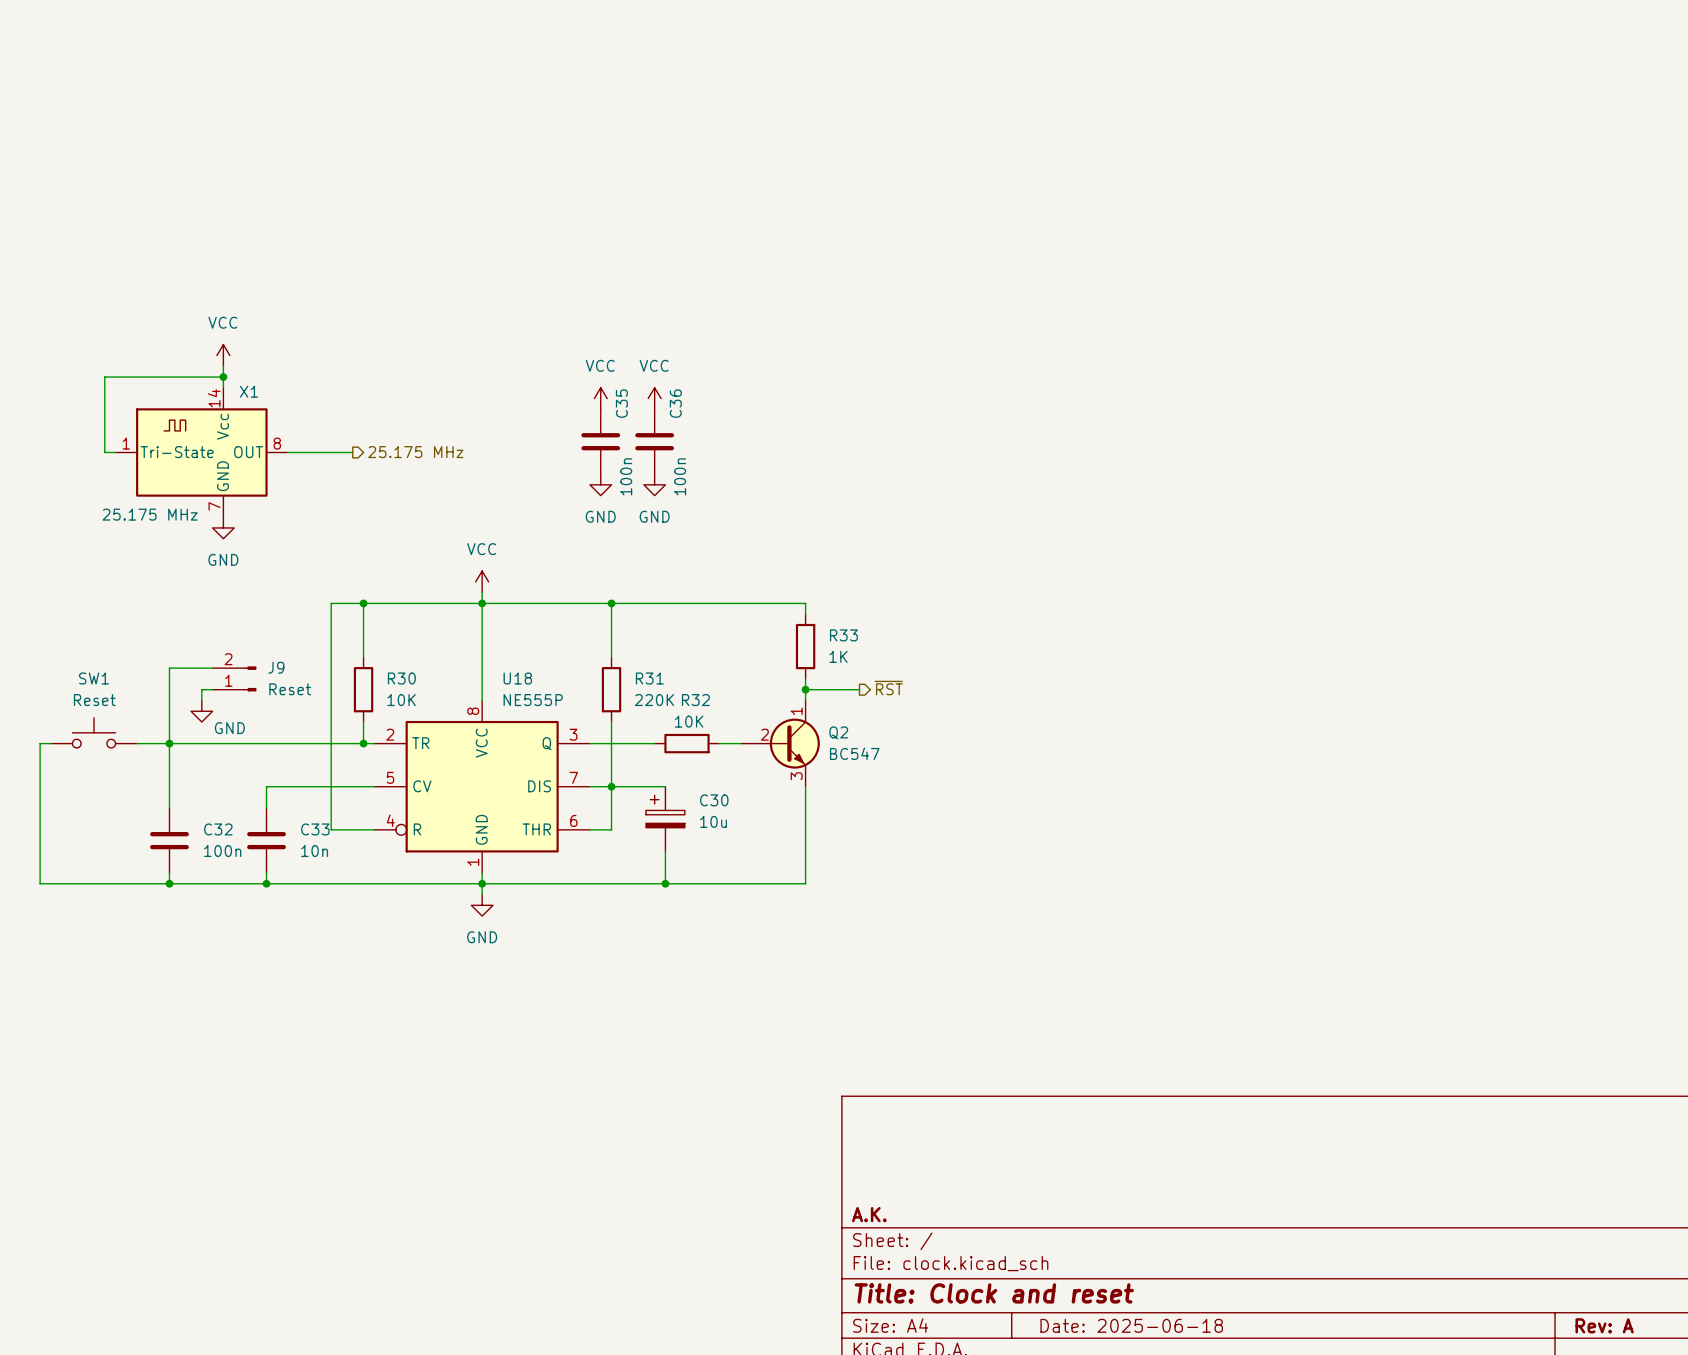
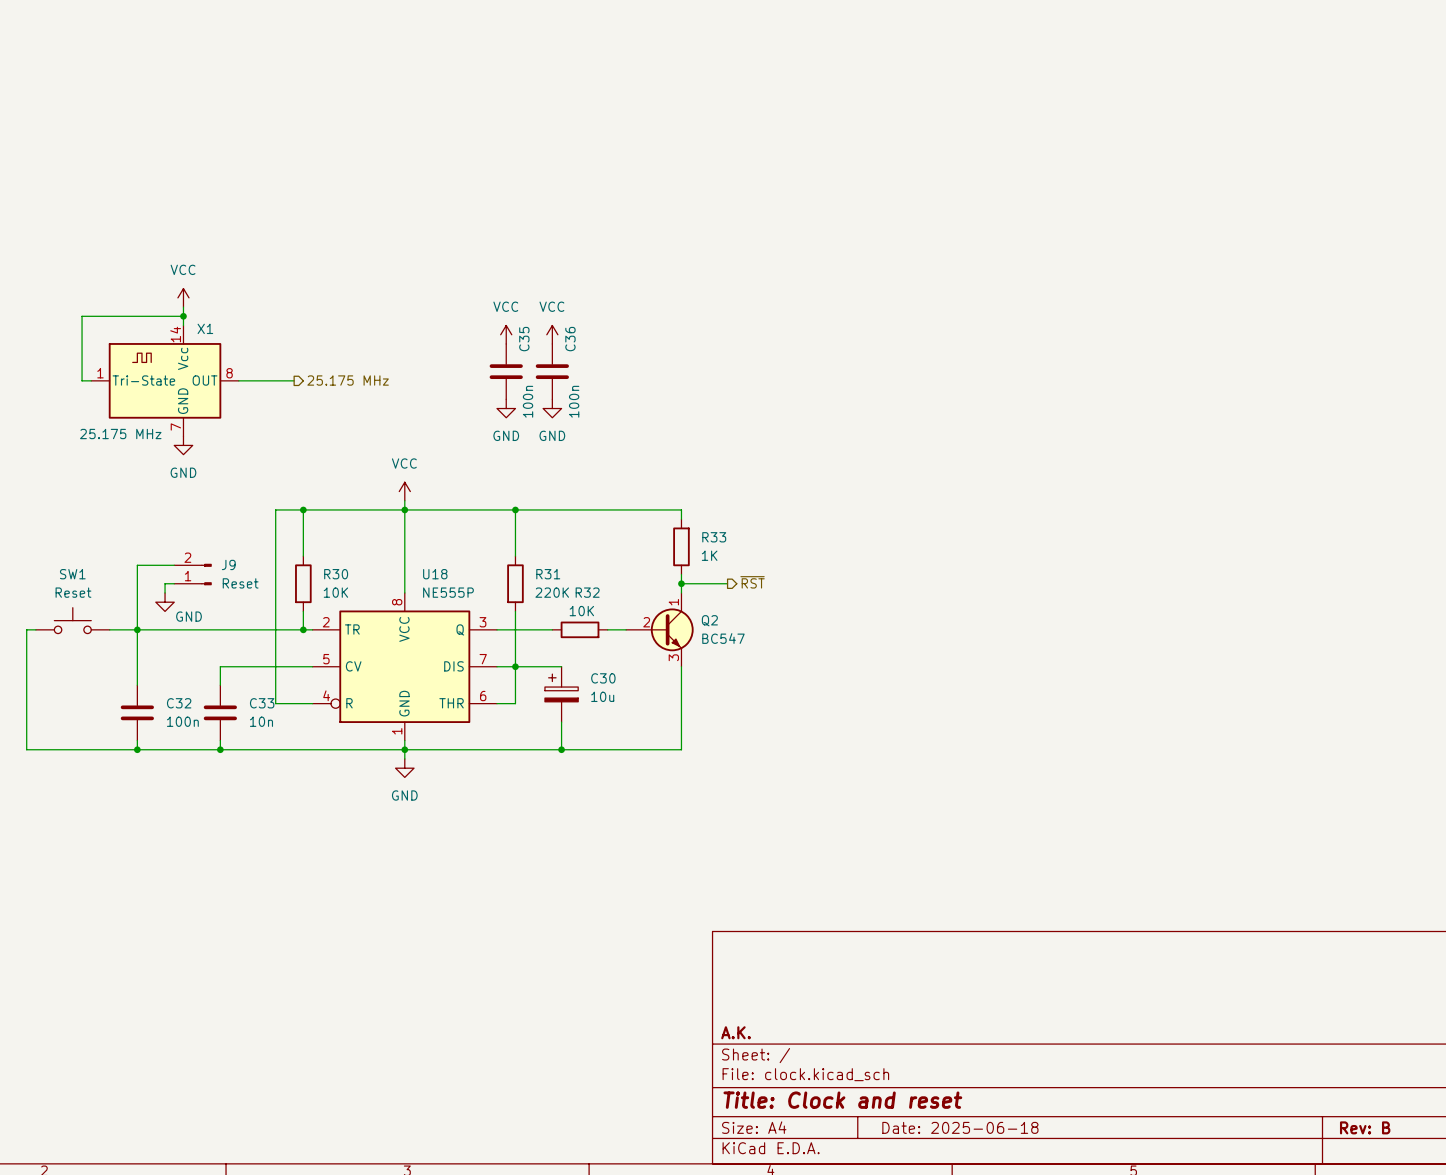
title block: Rev: A (1604, 1325) -> Rev: B (1365, 1127)

